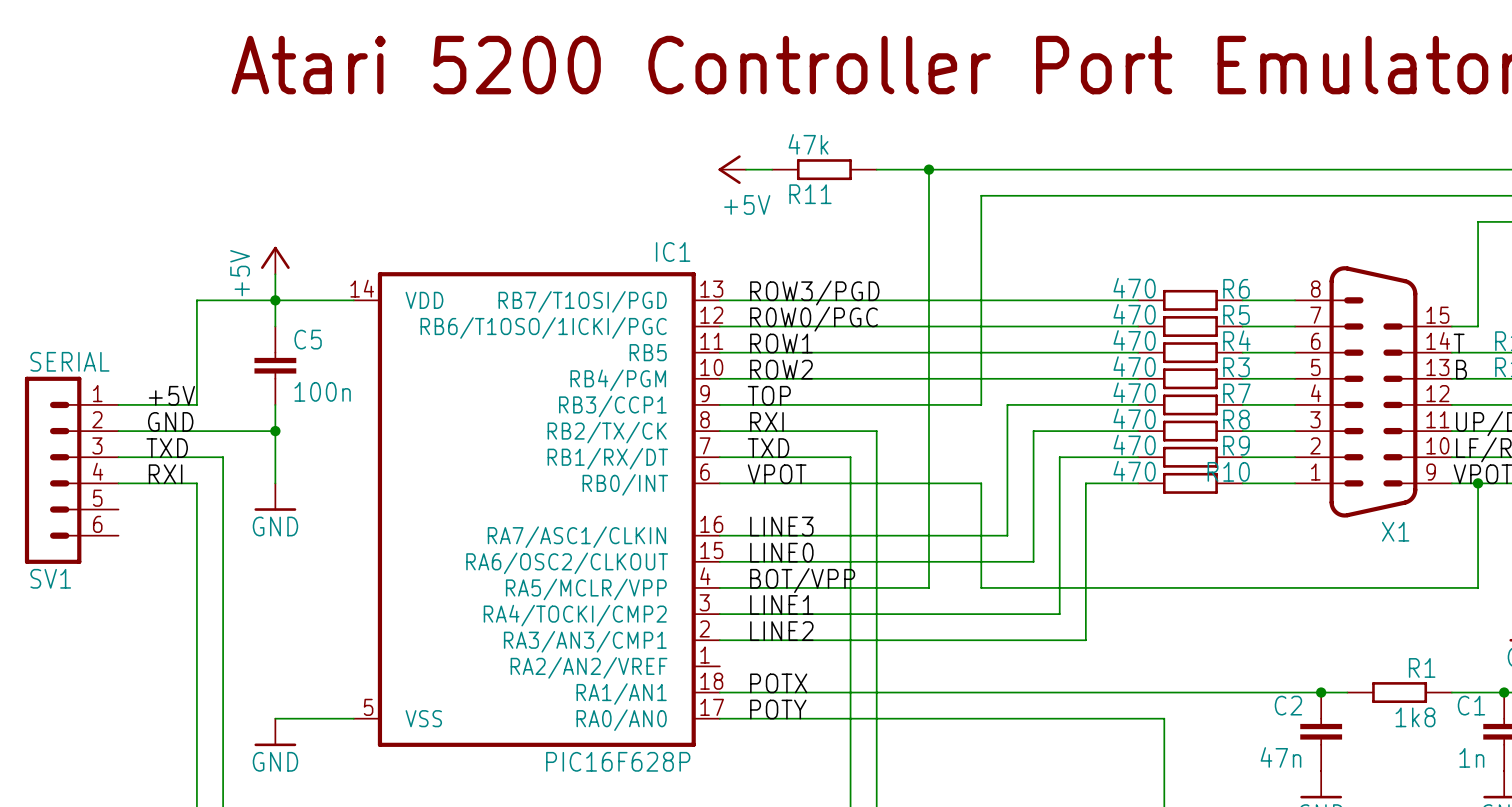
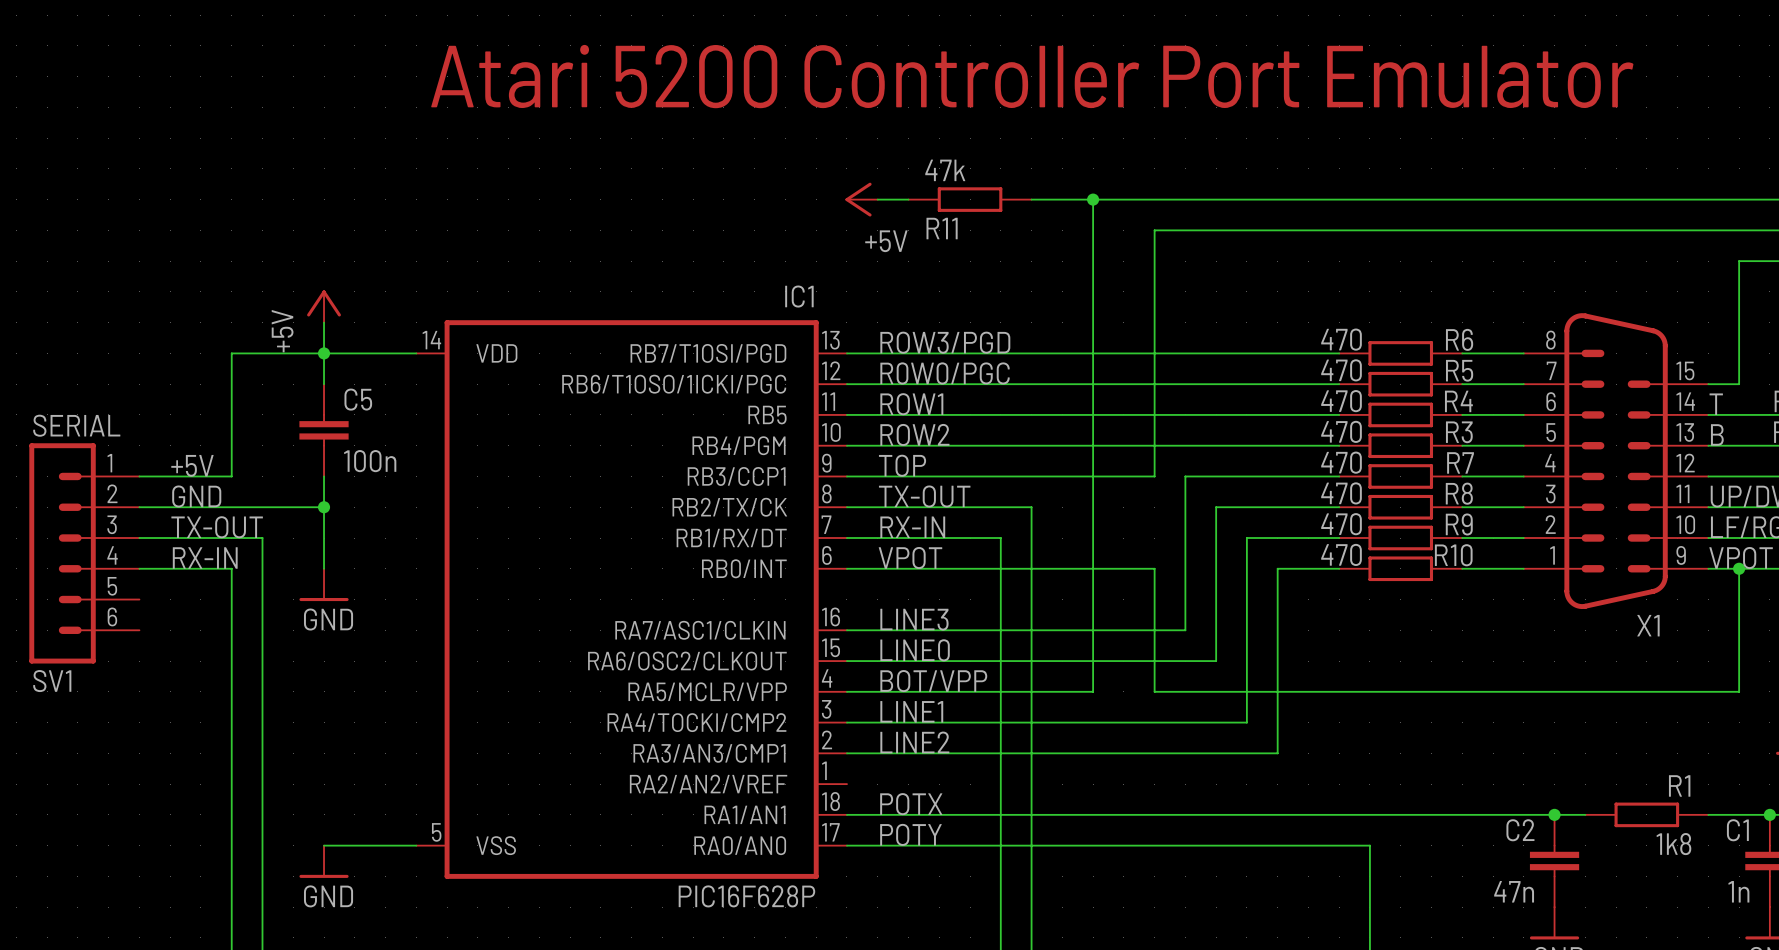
label: RXI (766, 421) -> TX-OUT (924, 496)
label: TXD (167, 448) -> TX-OUT (217, 527)
label: TXD (768, 448) -> RX-IN (912, 527)
label: RXI (165, 474) -> RX-IN (205, 558)

